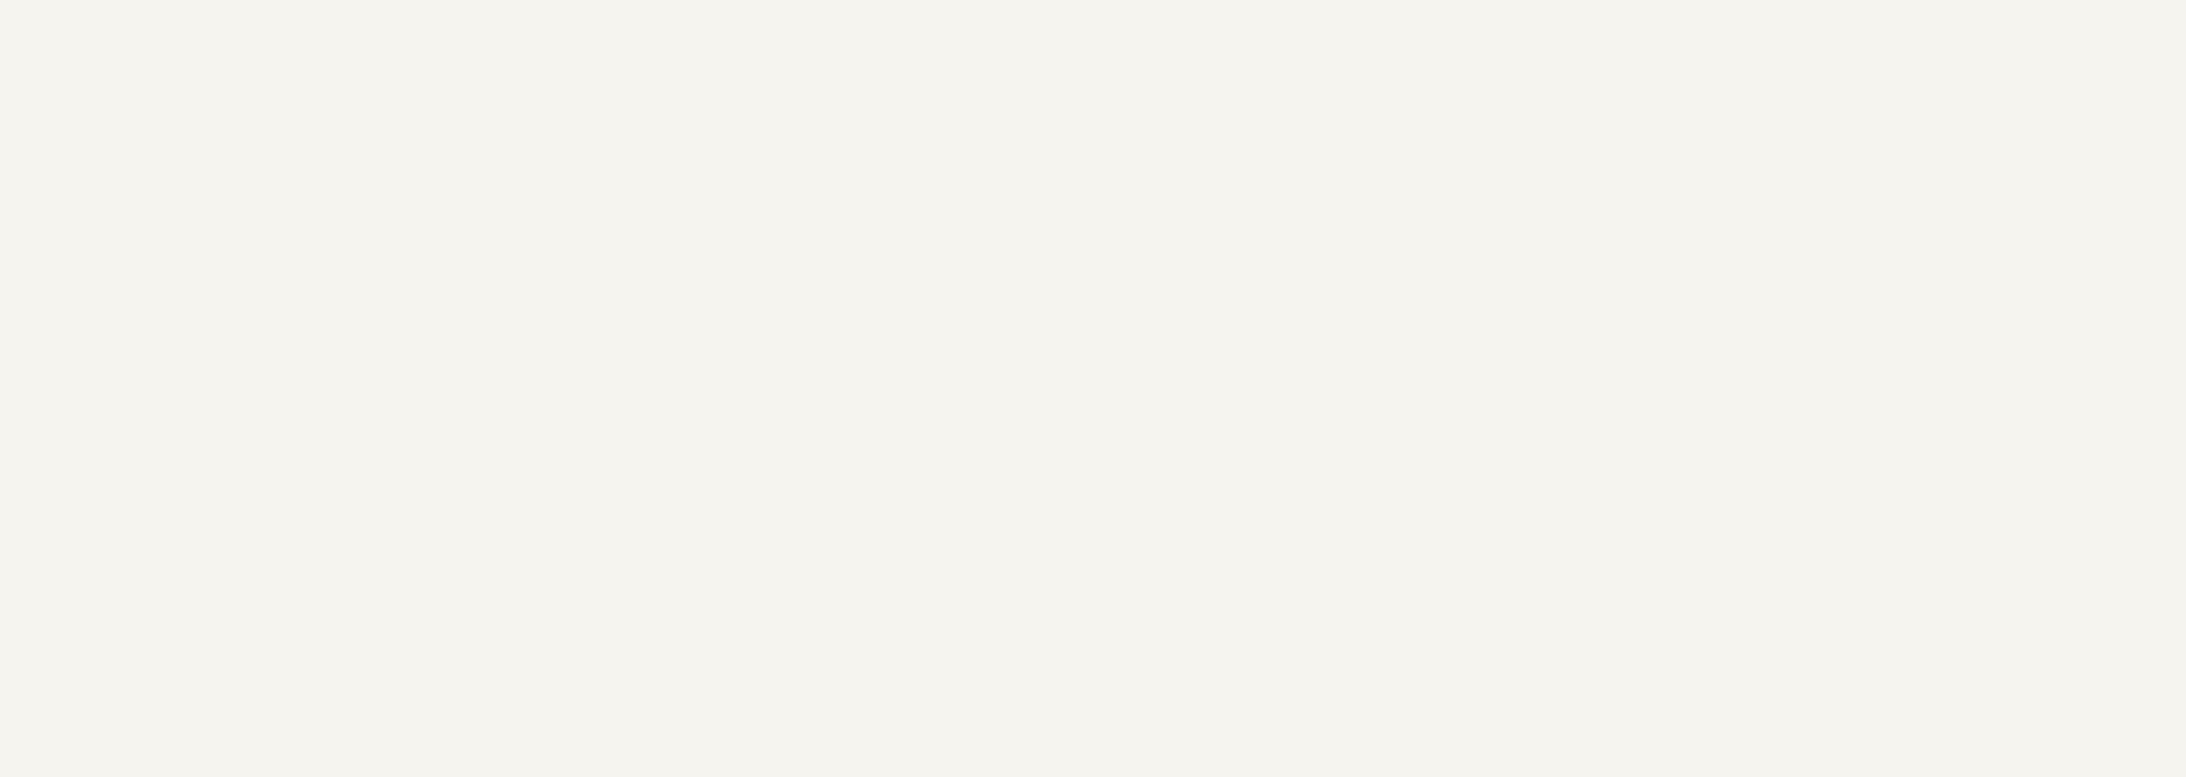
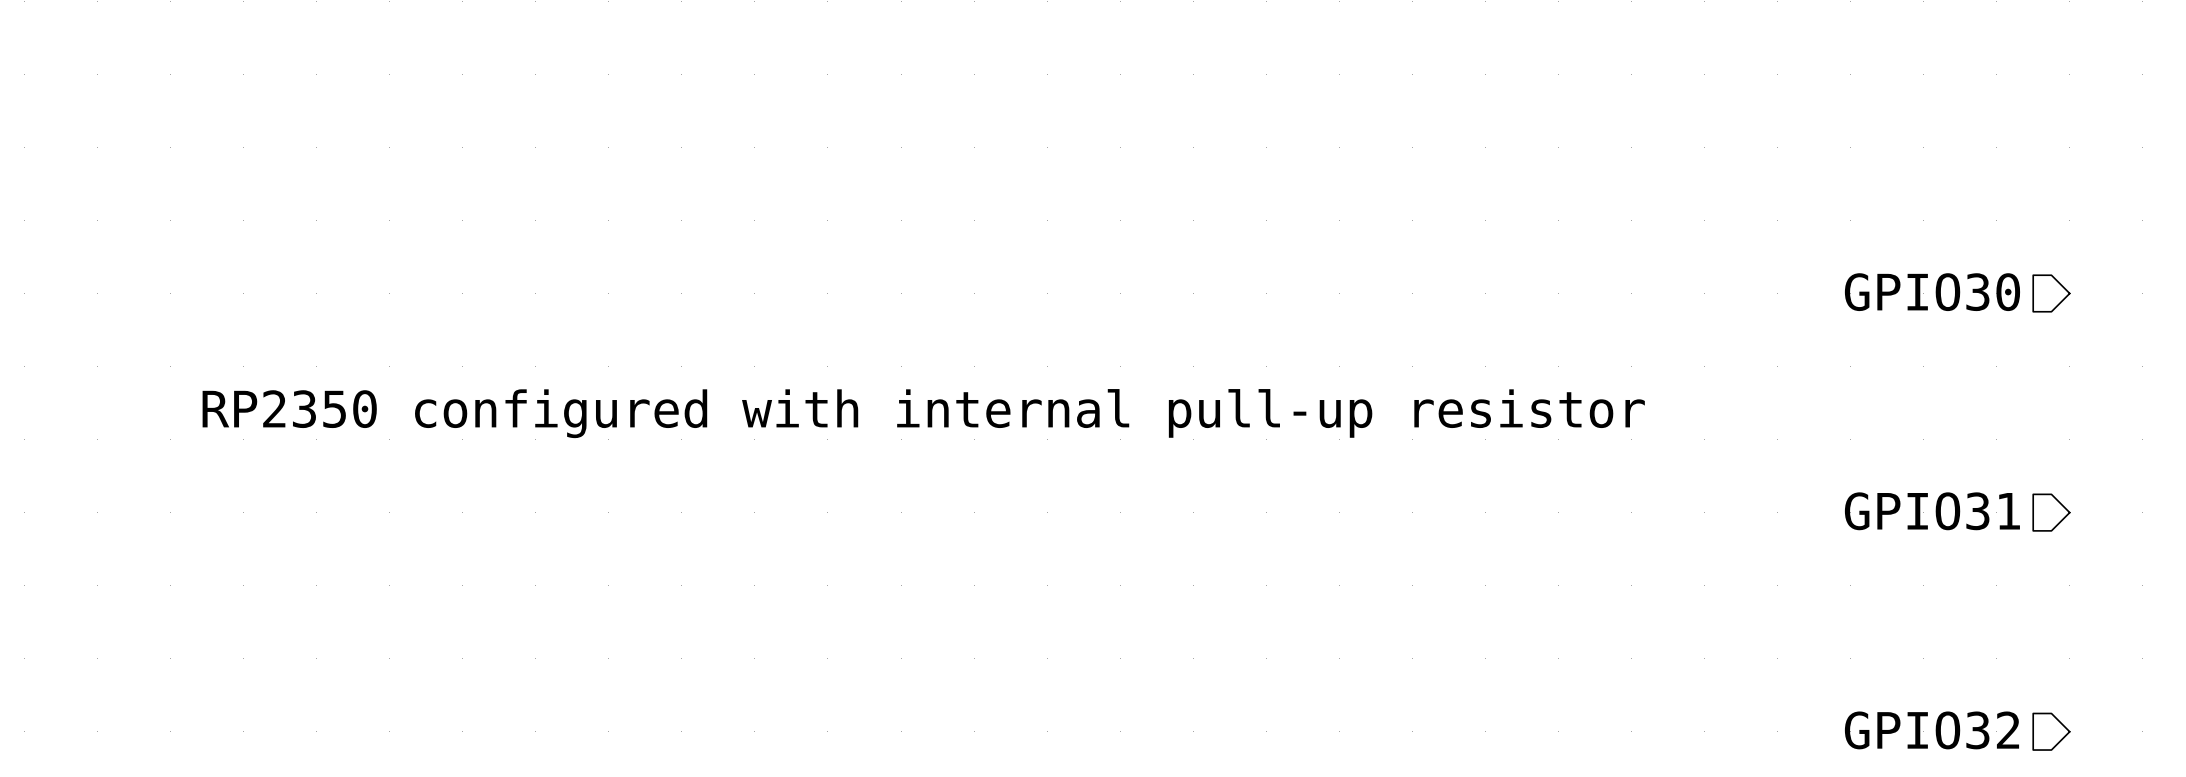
hierarchical label: none -> GPIO30 (1932, 292)
text: none -> RP2350 configured with internal pull-up resistor (923, 413)
hierarchical label: none -> GPIO31 (1932, 511)
hierarchical label: none -> GPIO32 (1931, 730)

